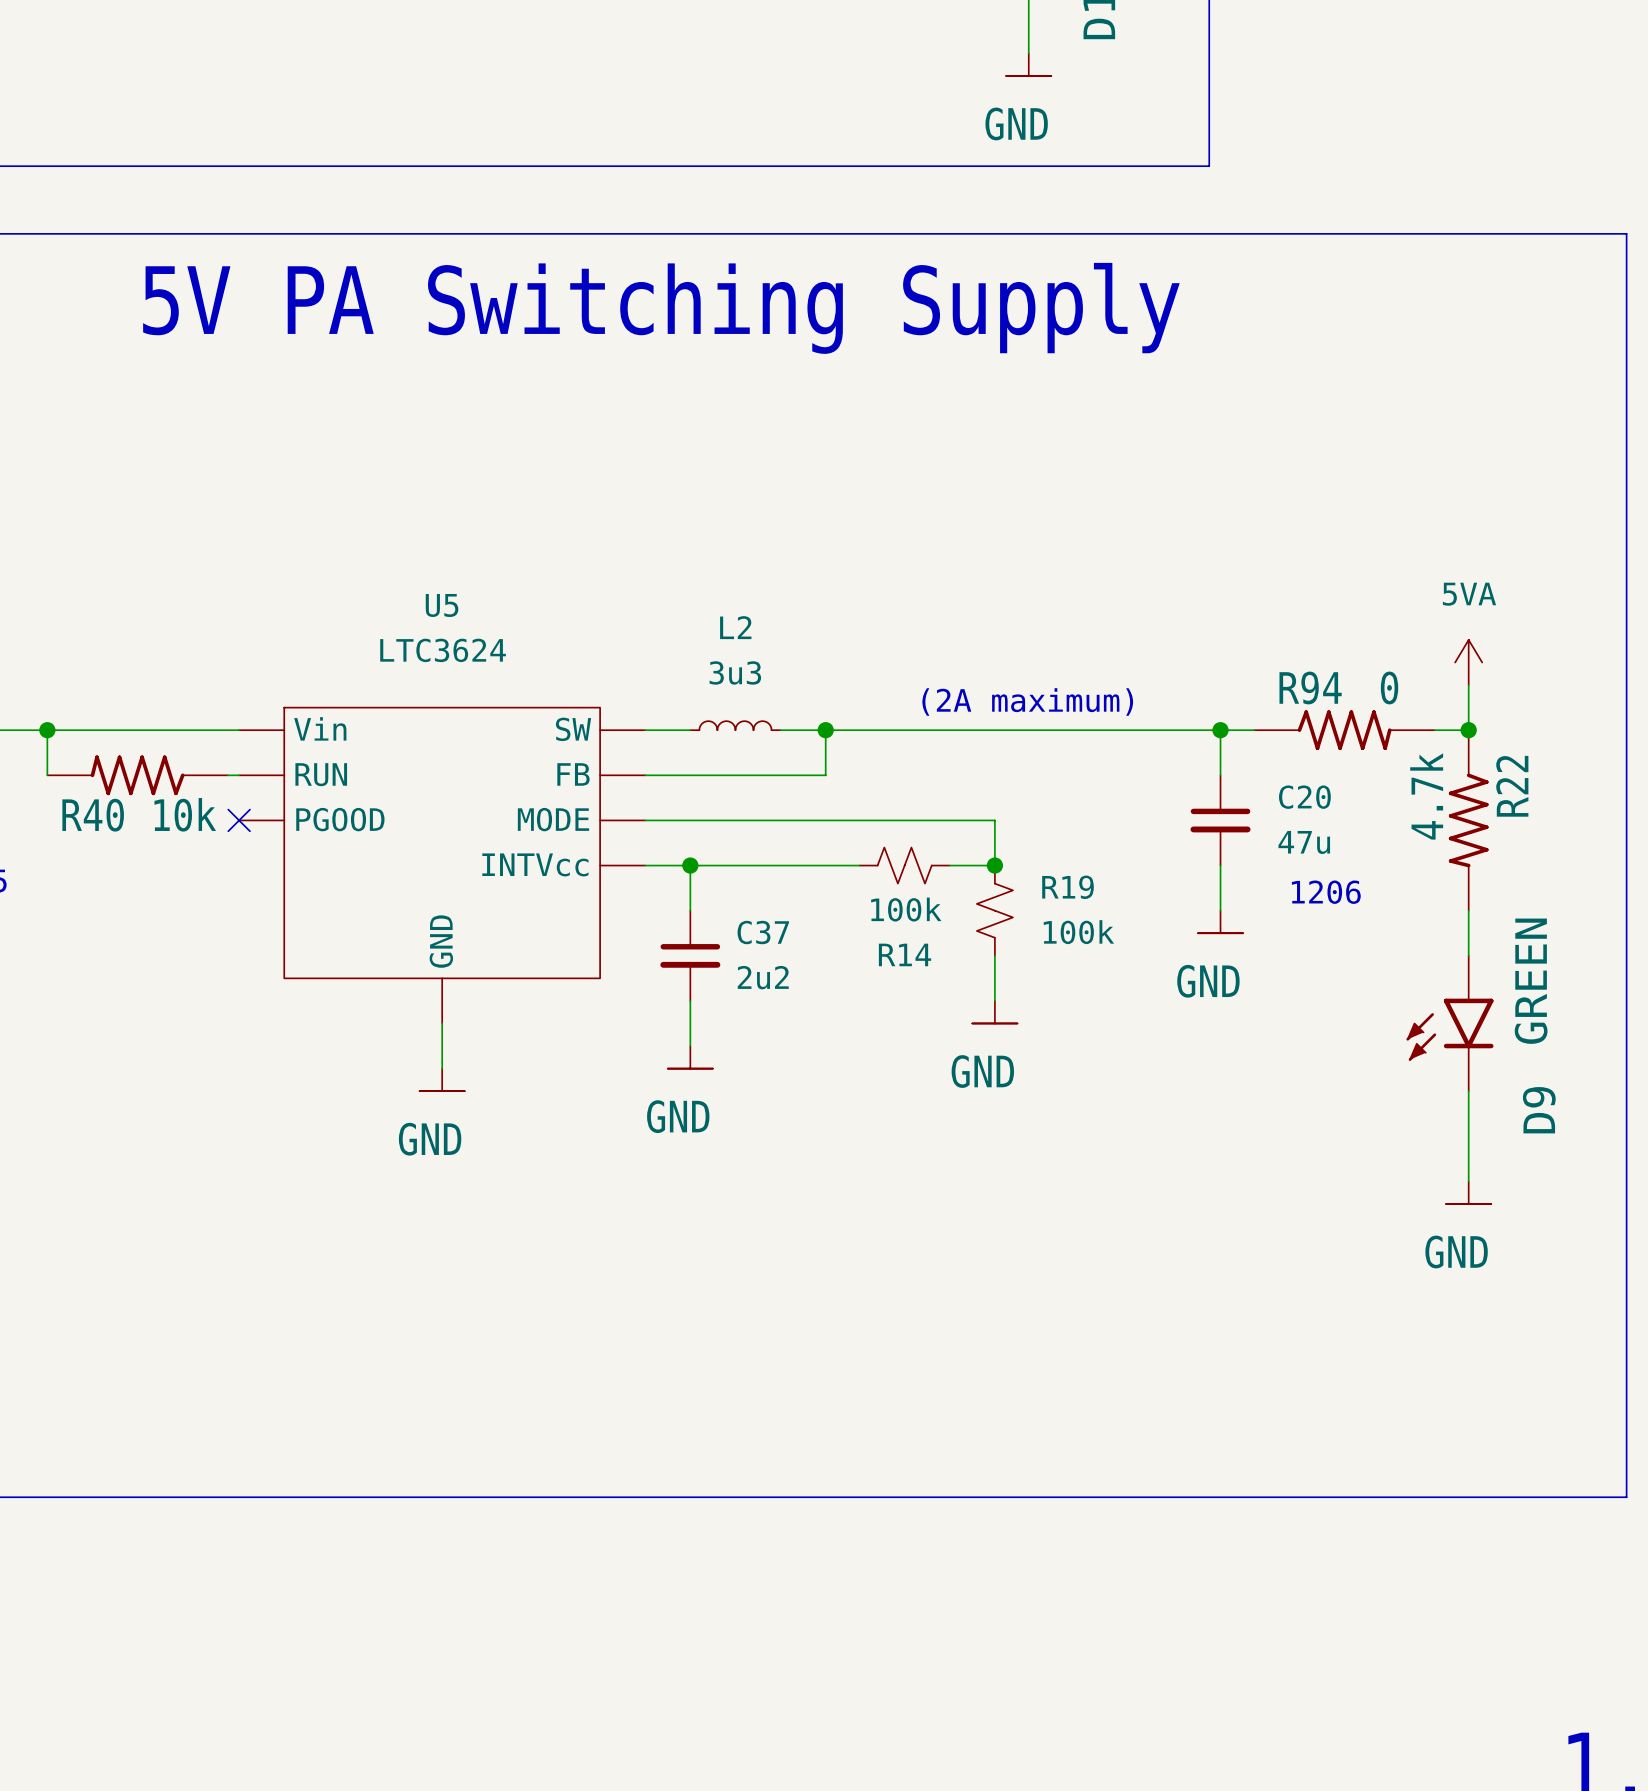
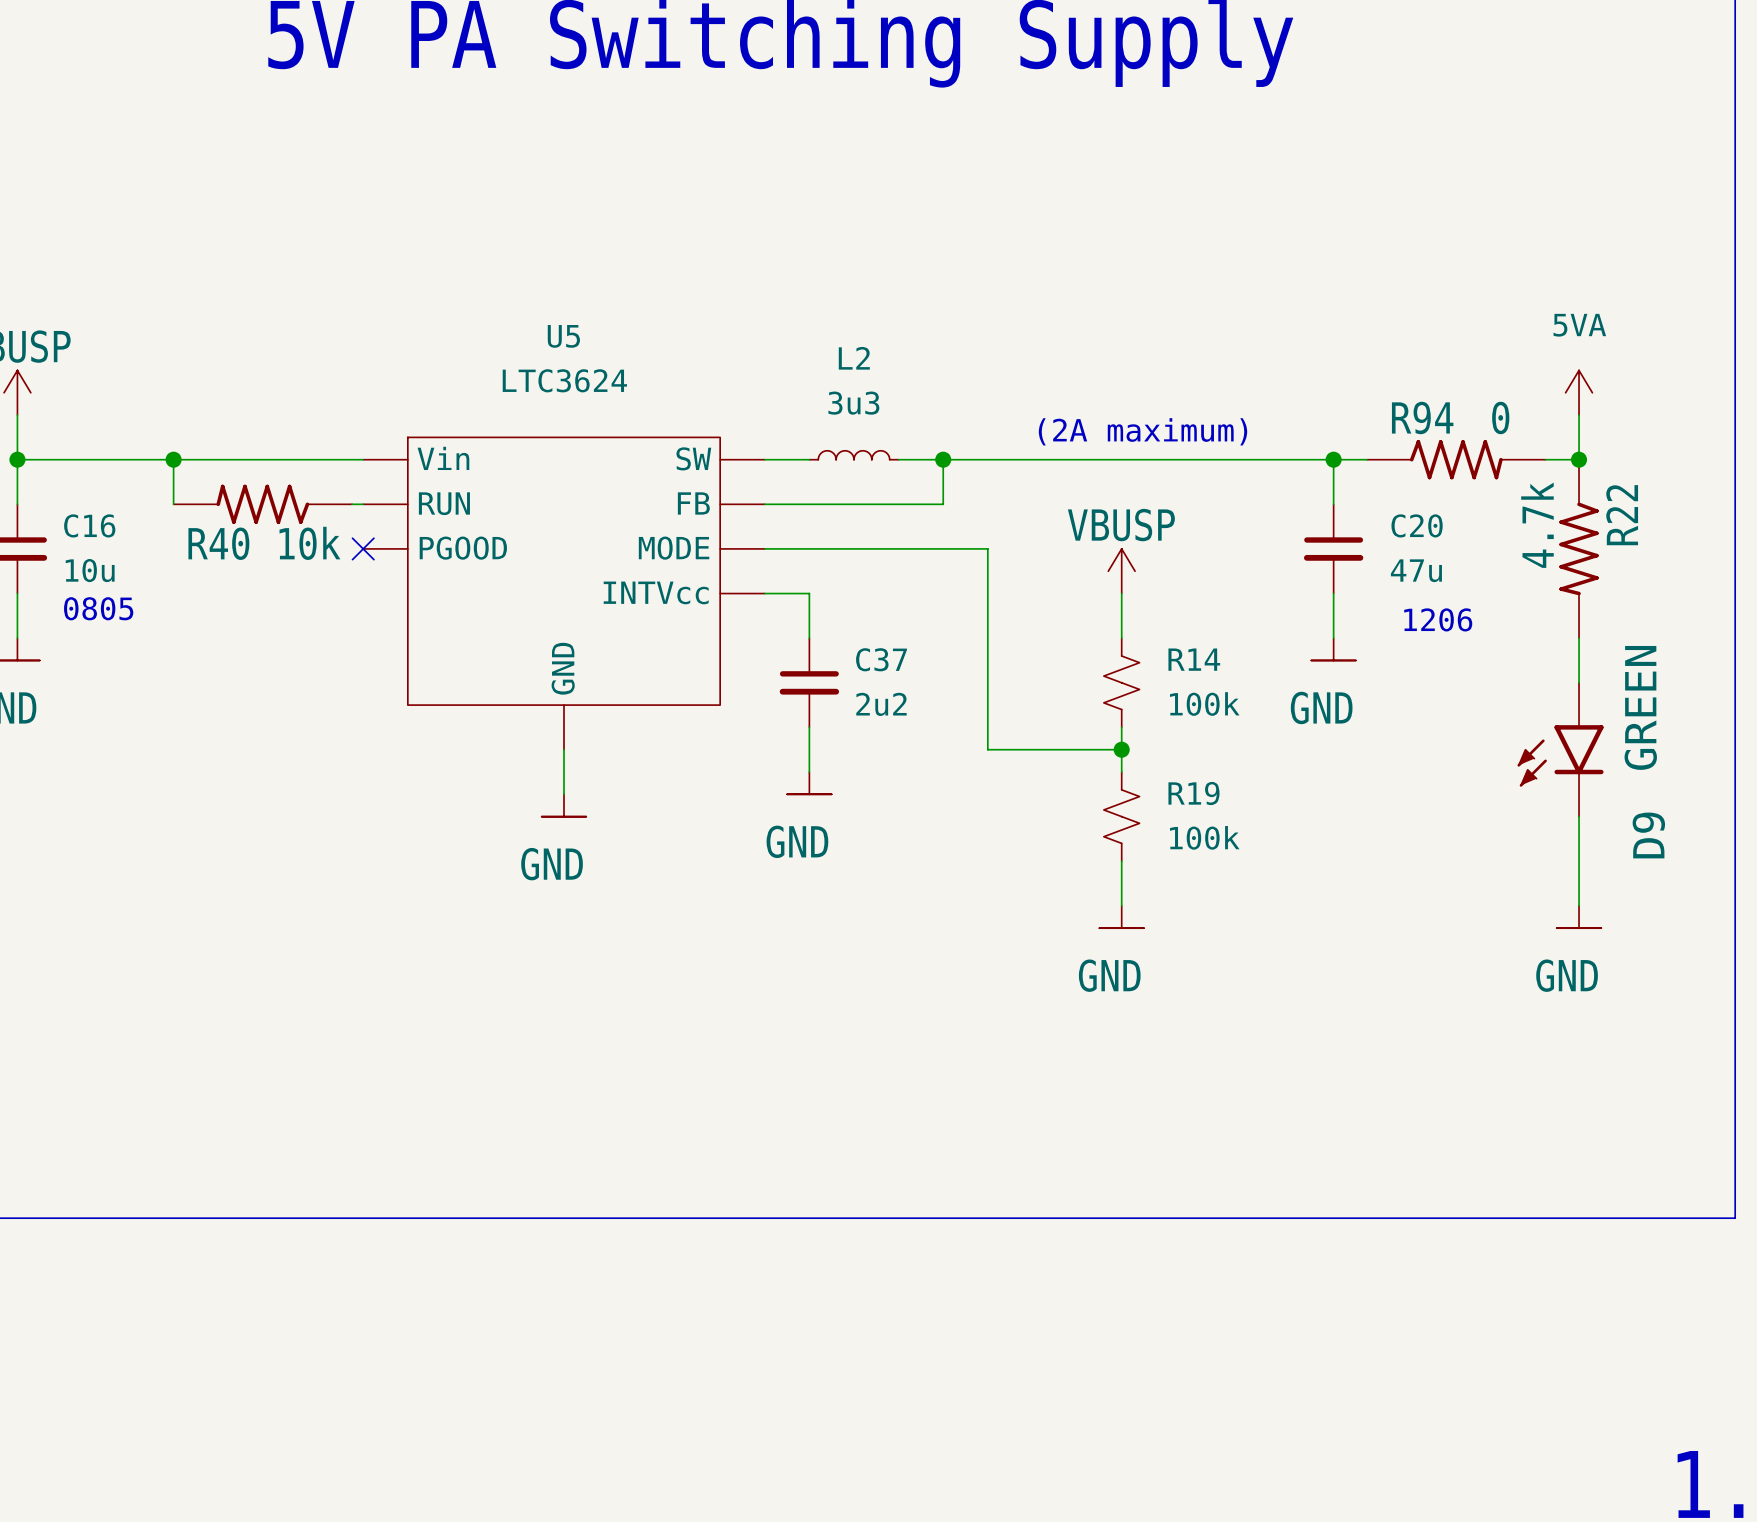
wire: (870, 820) (994, 820) (994, 865) (949, 865) -> (987, 548) (987, 749) (1121, 749)
power symbol: none -> VBUSP (1121, 571)
wire: (690, 865) (859, 865) -> none
junction: (690, 865) -> none
R14 rotation: 0° (904, 865) -> 90° clockwise (1121, 682)
R14 position: (904, 865) -> (1121, 682)
junction: (994, 865) -> none
wire: none -> (1121, 593) (1121, 638)
R14 value position: 100k (906, 909) -> 100k (1204, 704)
R19 position: (994, 910) -> (1121, 816)
R14 name position: R14 (905, 954) -> R14 (1194, 659)
wire: (994, 955) (994, 1000) -> (1121, 727) (1121, 772)
power symbol position: GND (994, 1012) -> GND (1121, 917)
junction: none -> (1121, 749)
wire: none -> (1121, 861) (1121, 905)

